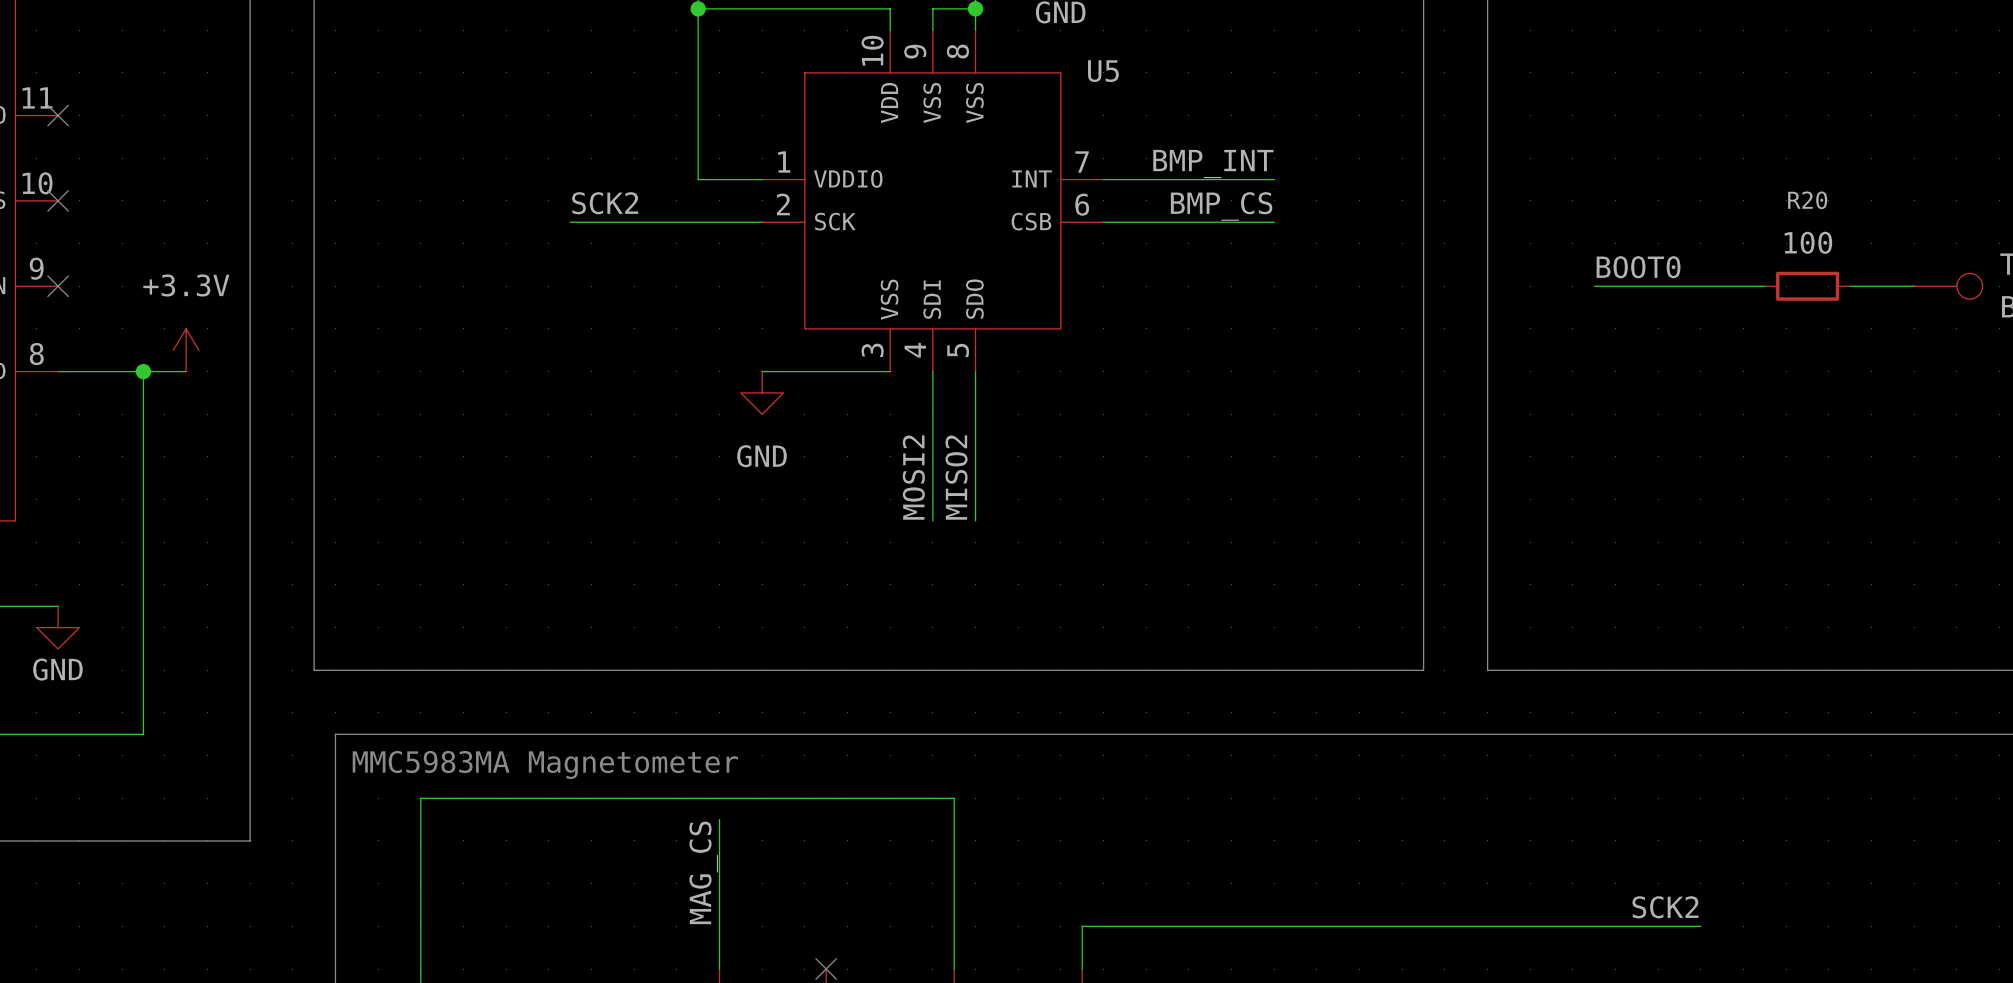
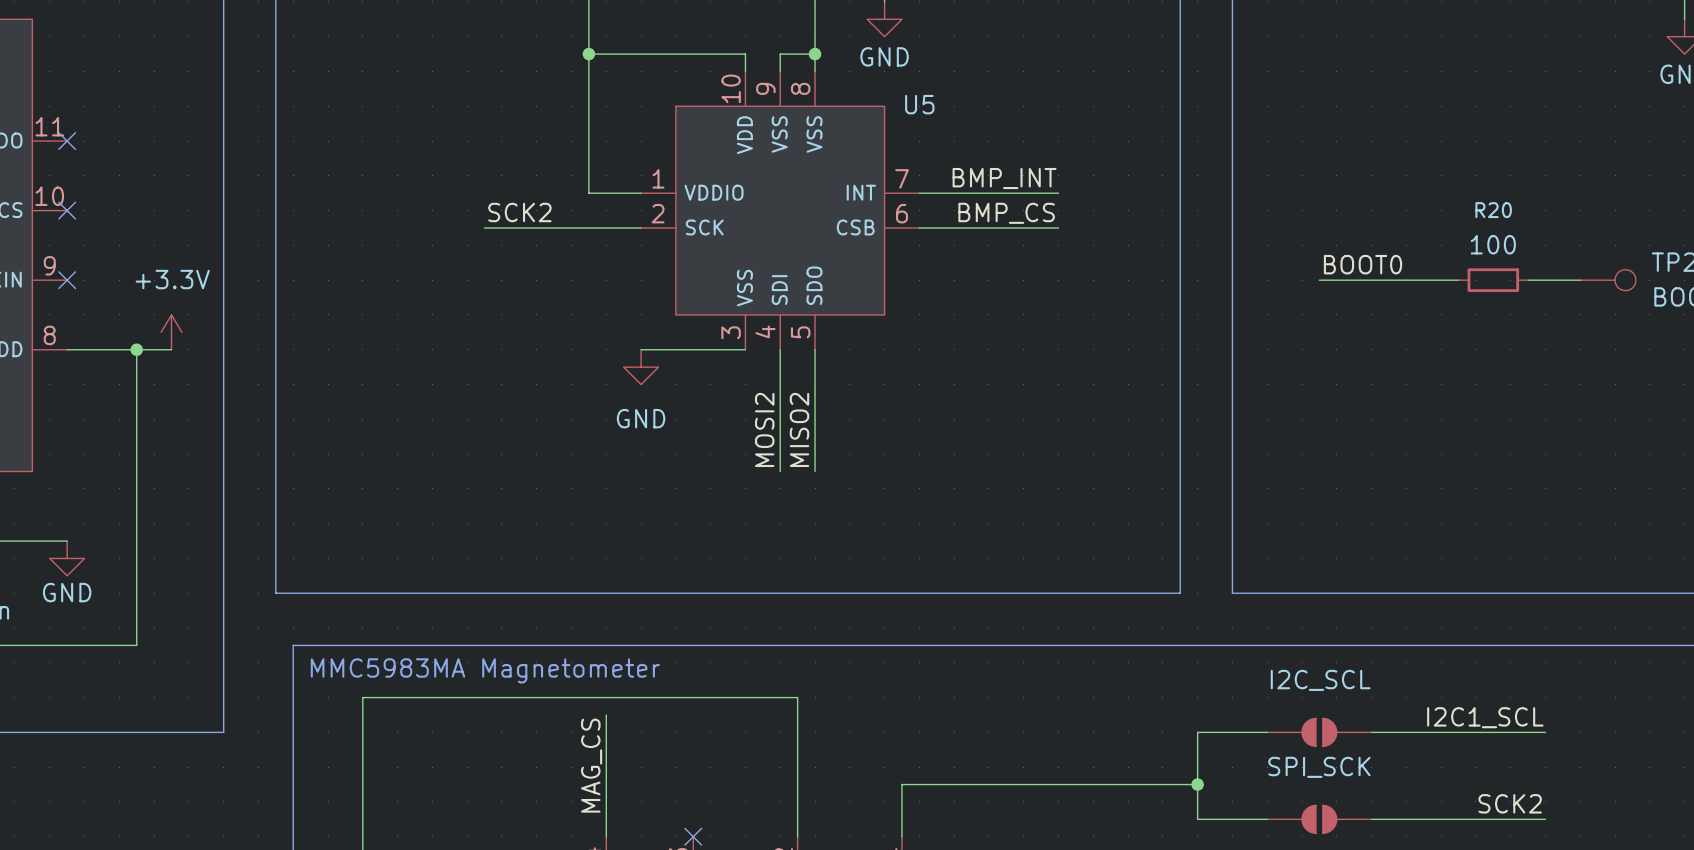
label: none -> I2C1_SCL (1485, 717)
wire: none -> (1267, 732) (1197, 732) (1197, 819) (1267, 819)
part: none -> I2C_SCL (1319, 732)
wire: none -> (1371, 732) (1545, 732)
junction: none -> (1197, 784)
label position: SCK2 (1665, 907) -> SCK2 (1510, 803)
wire: (1082, 926) (1700, 926) -> (901, 801) (901, 784) (1197, 784)
part: none -> SPI_SCK (1319, 819)
wire: none -> (1371, 819) (1545, 819)

